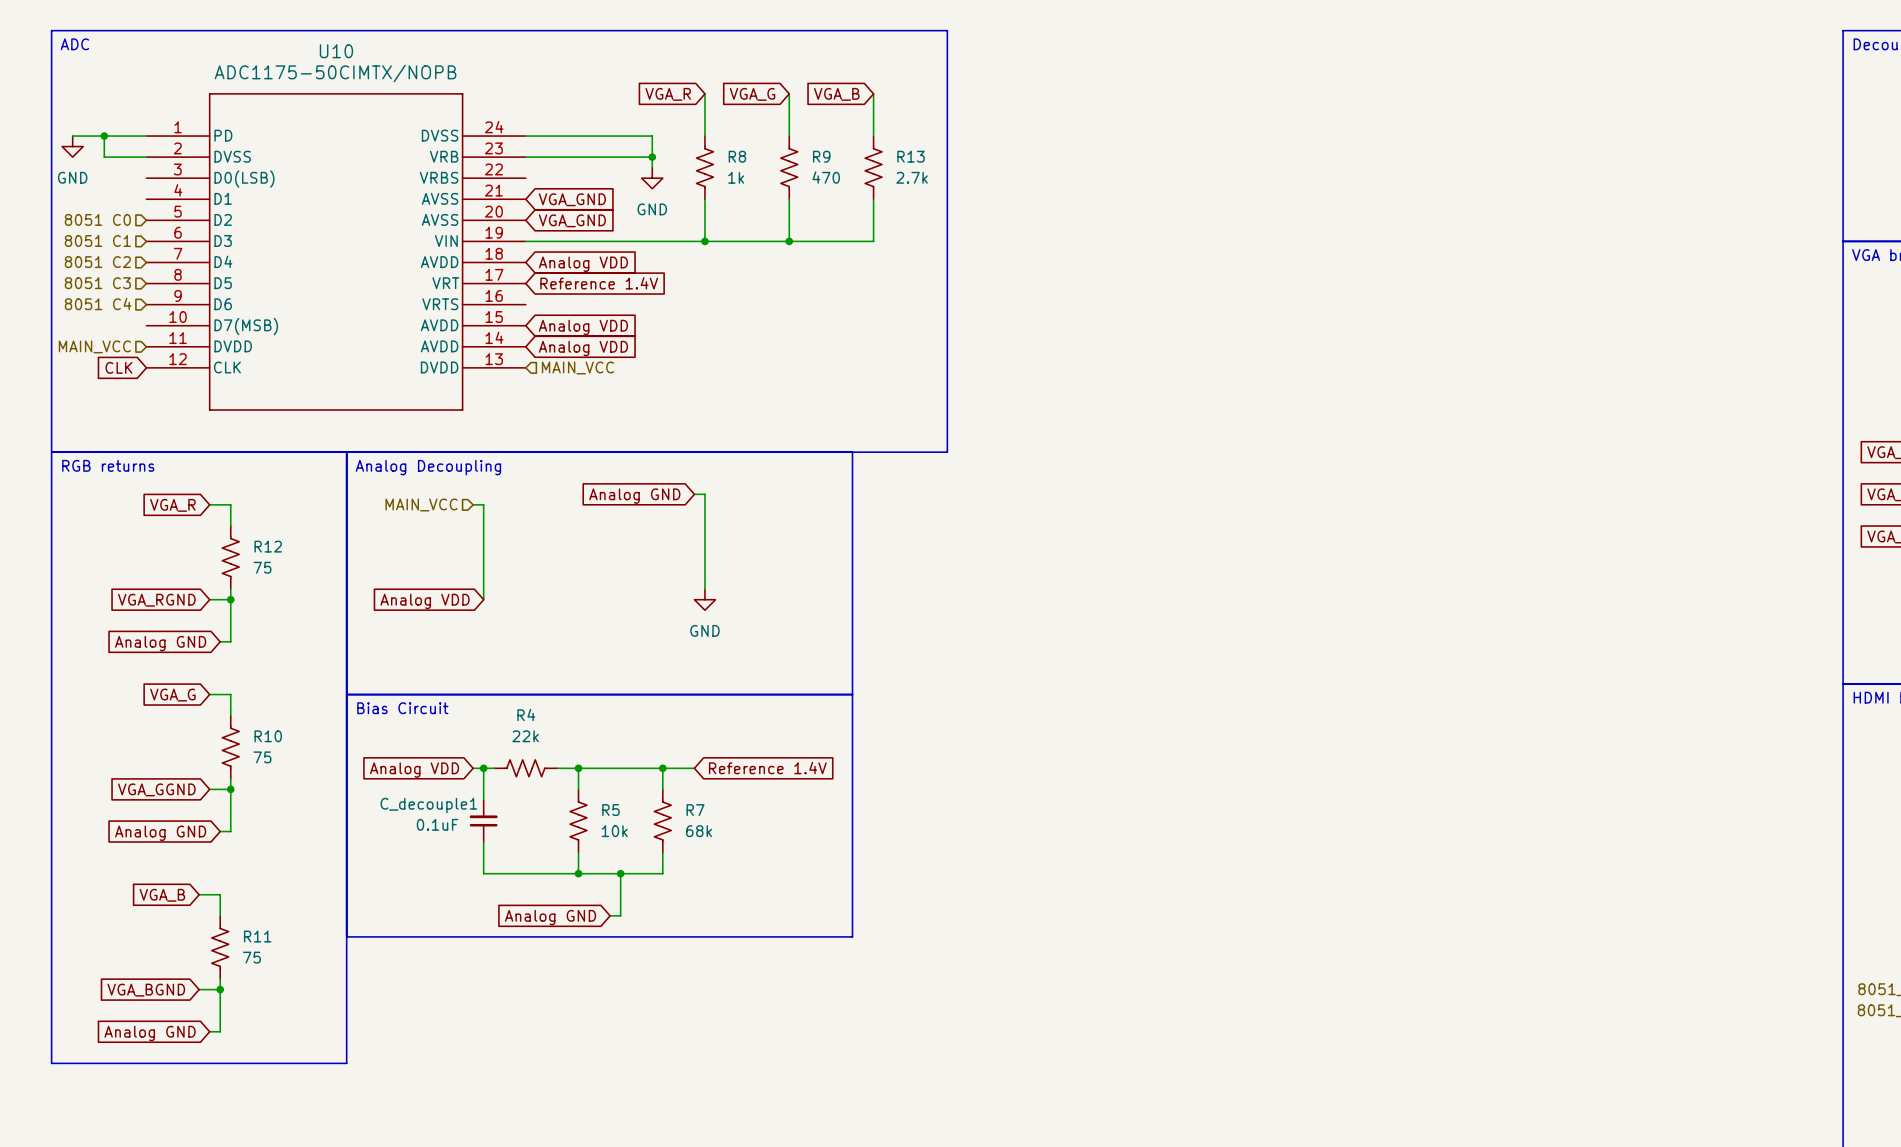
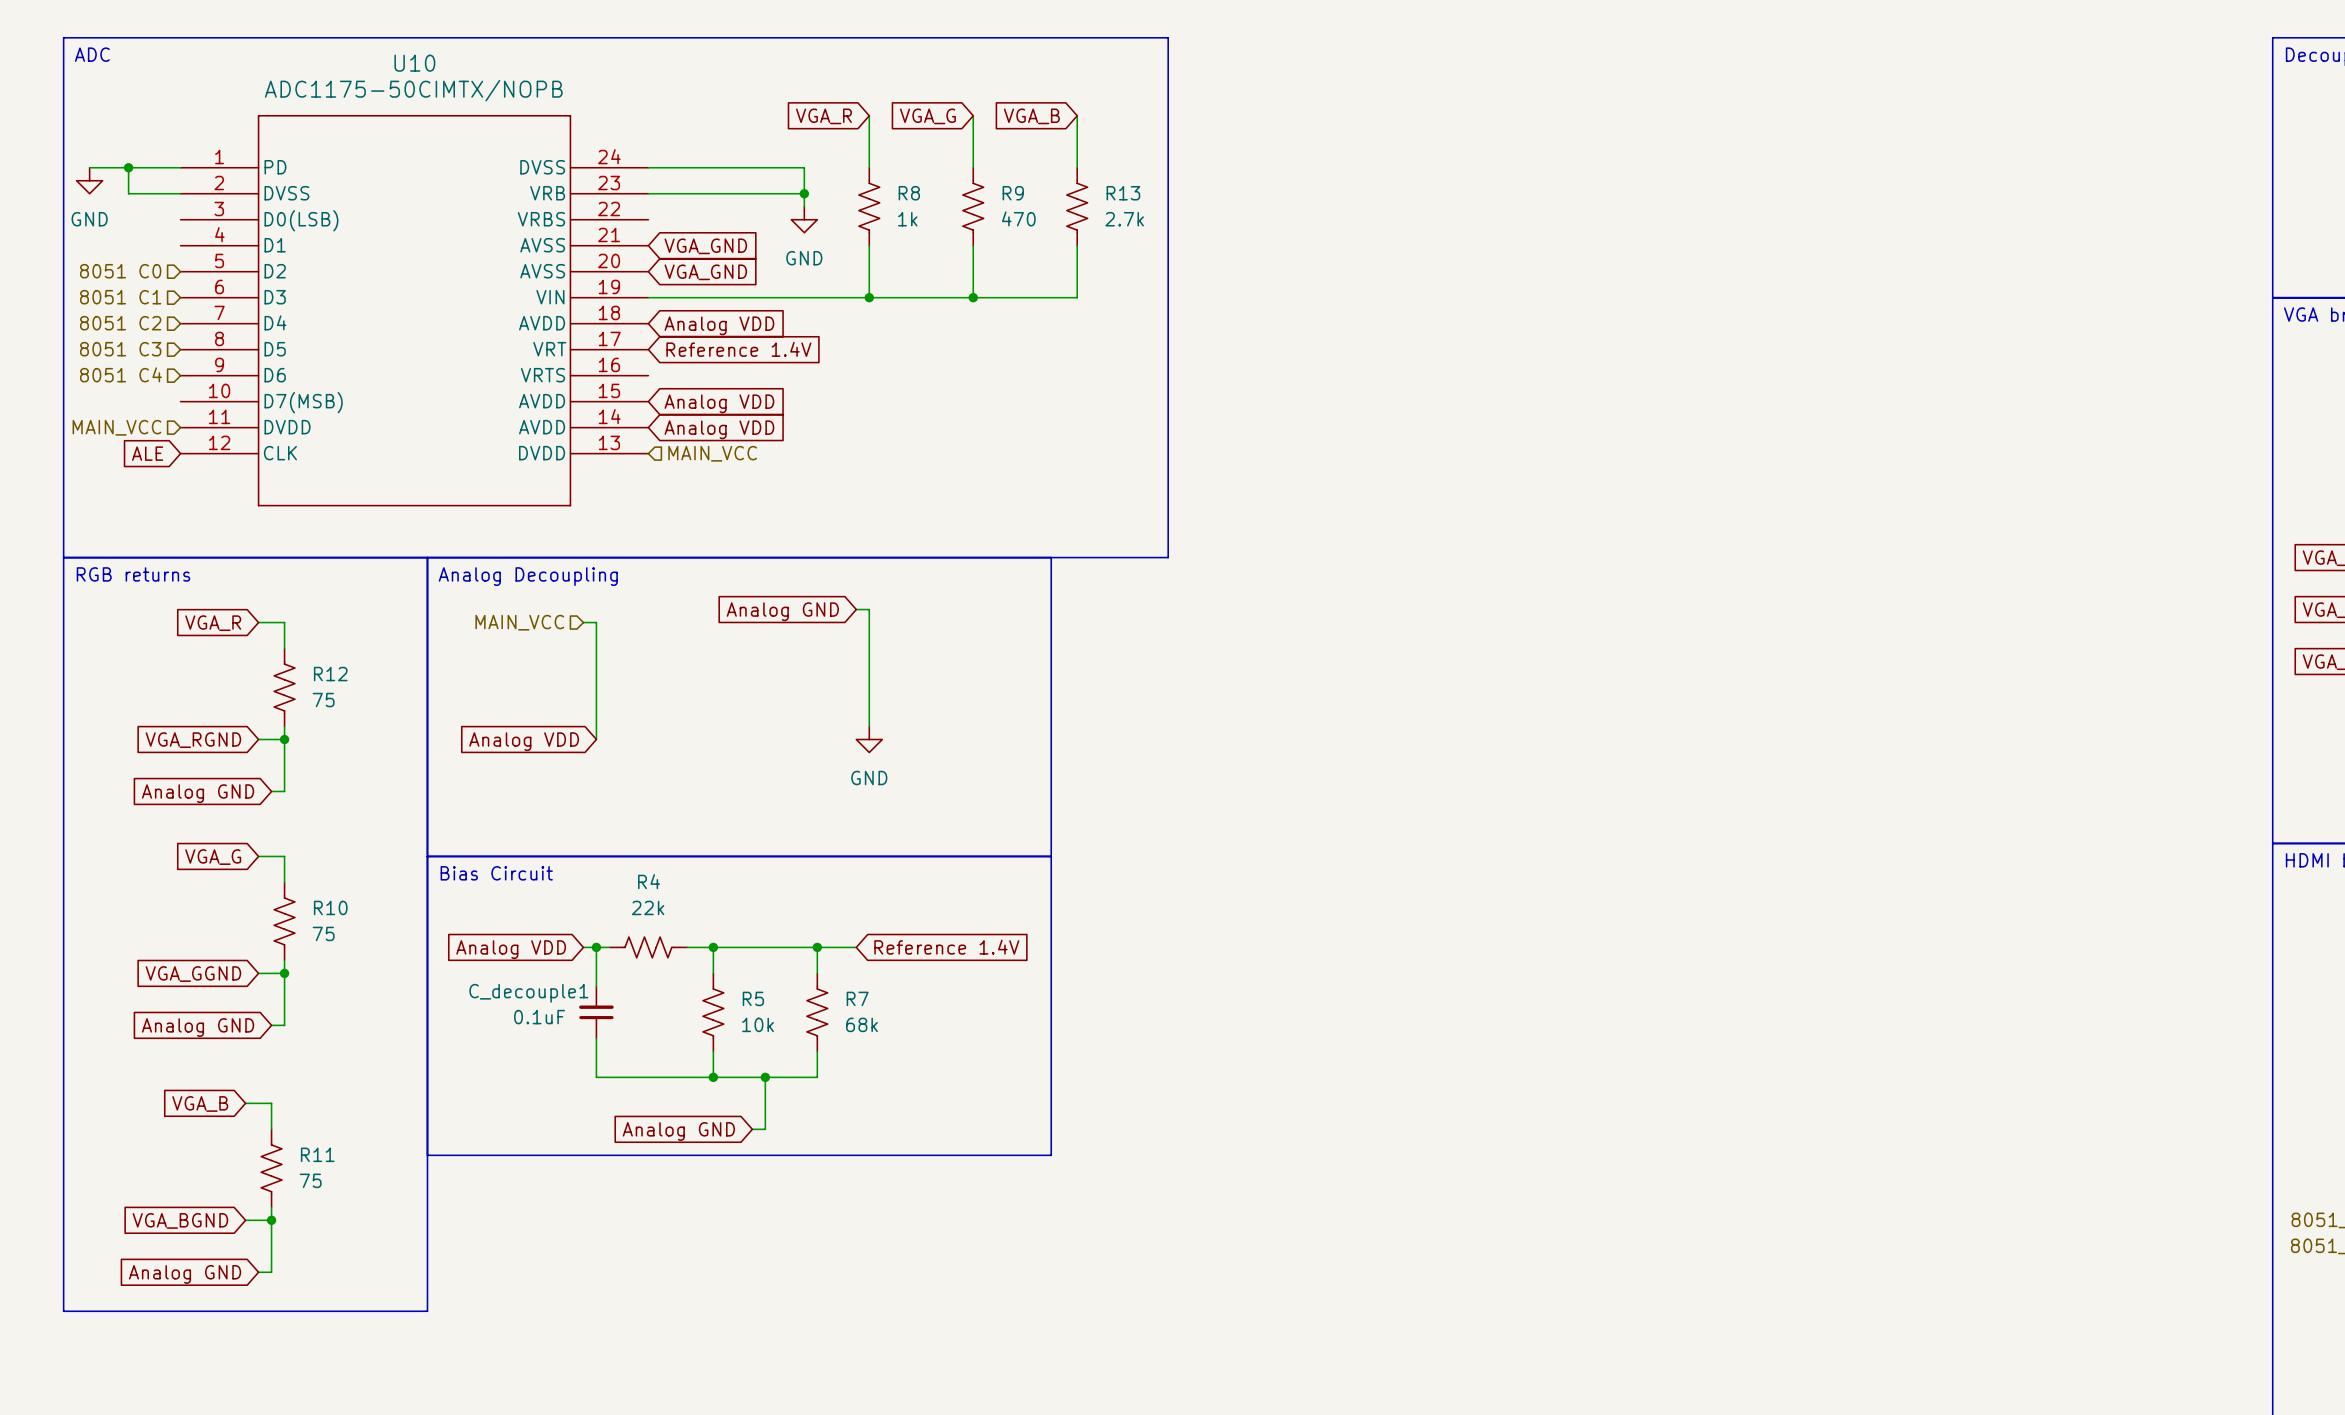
global label: CLK (118, 367) -> ALE (147, 453)

